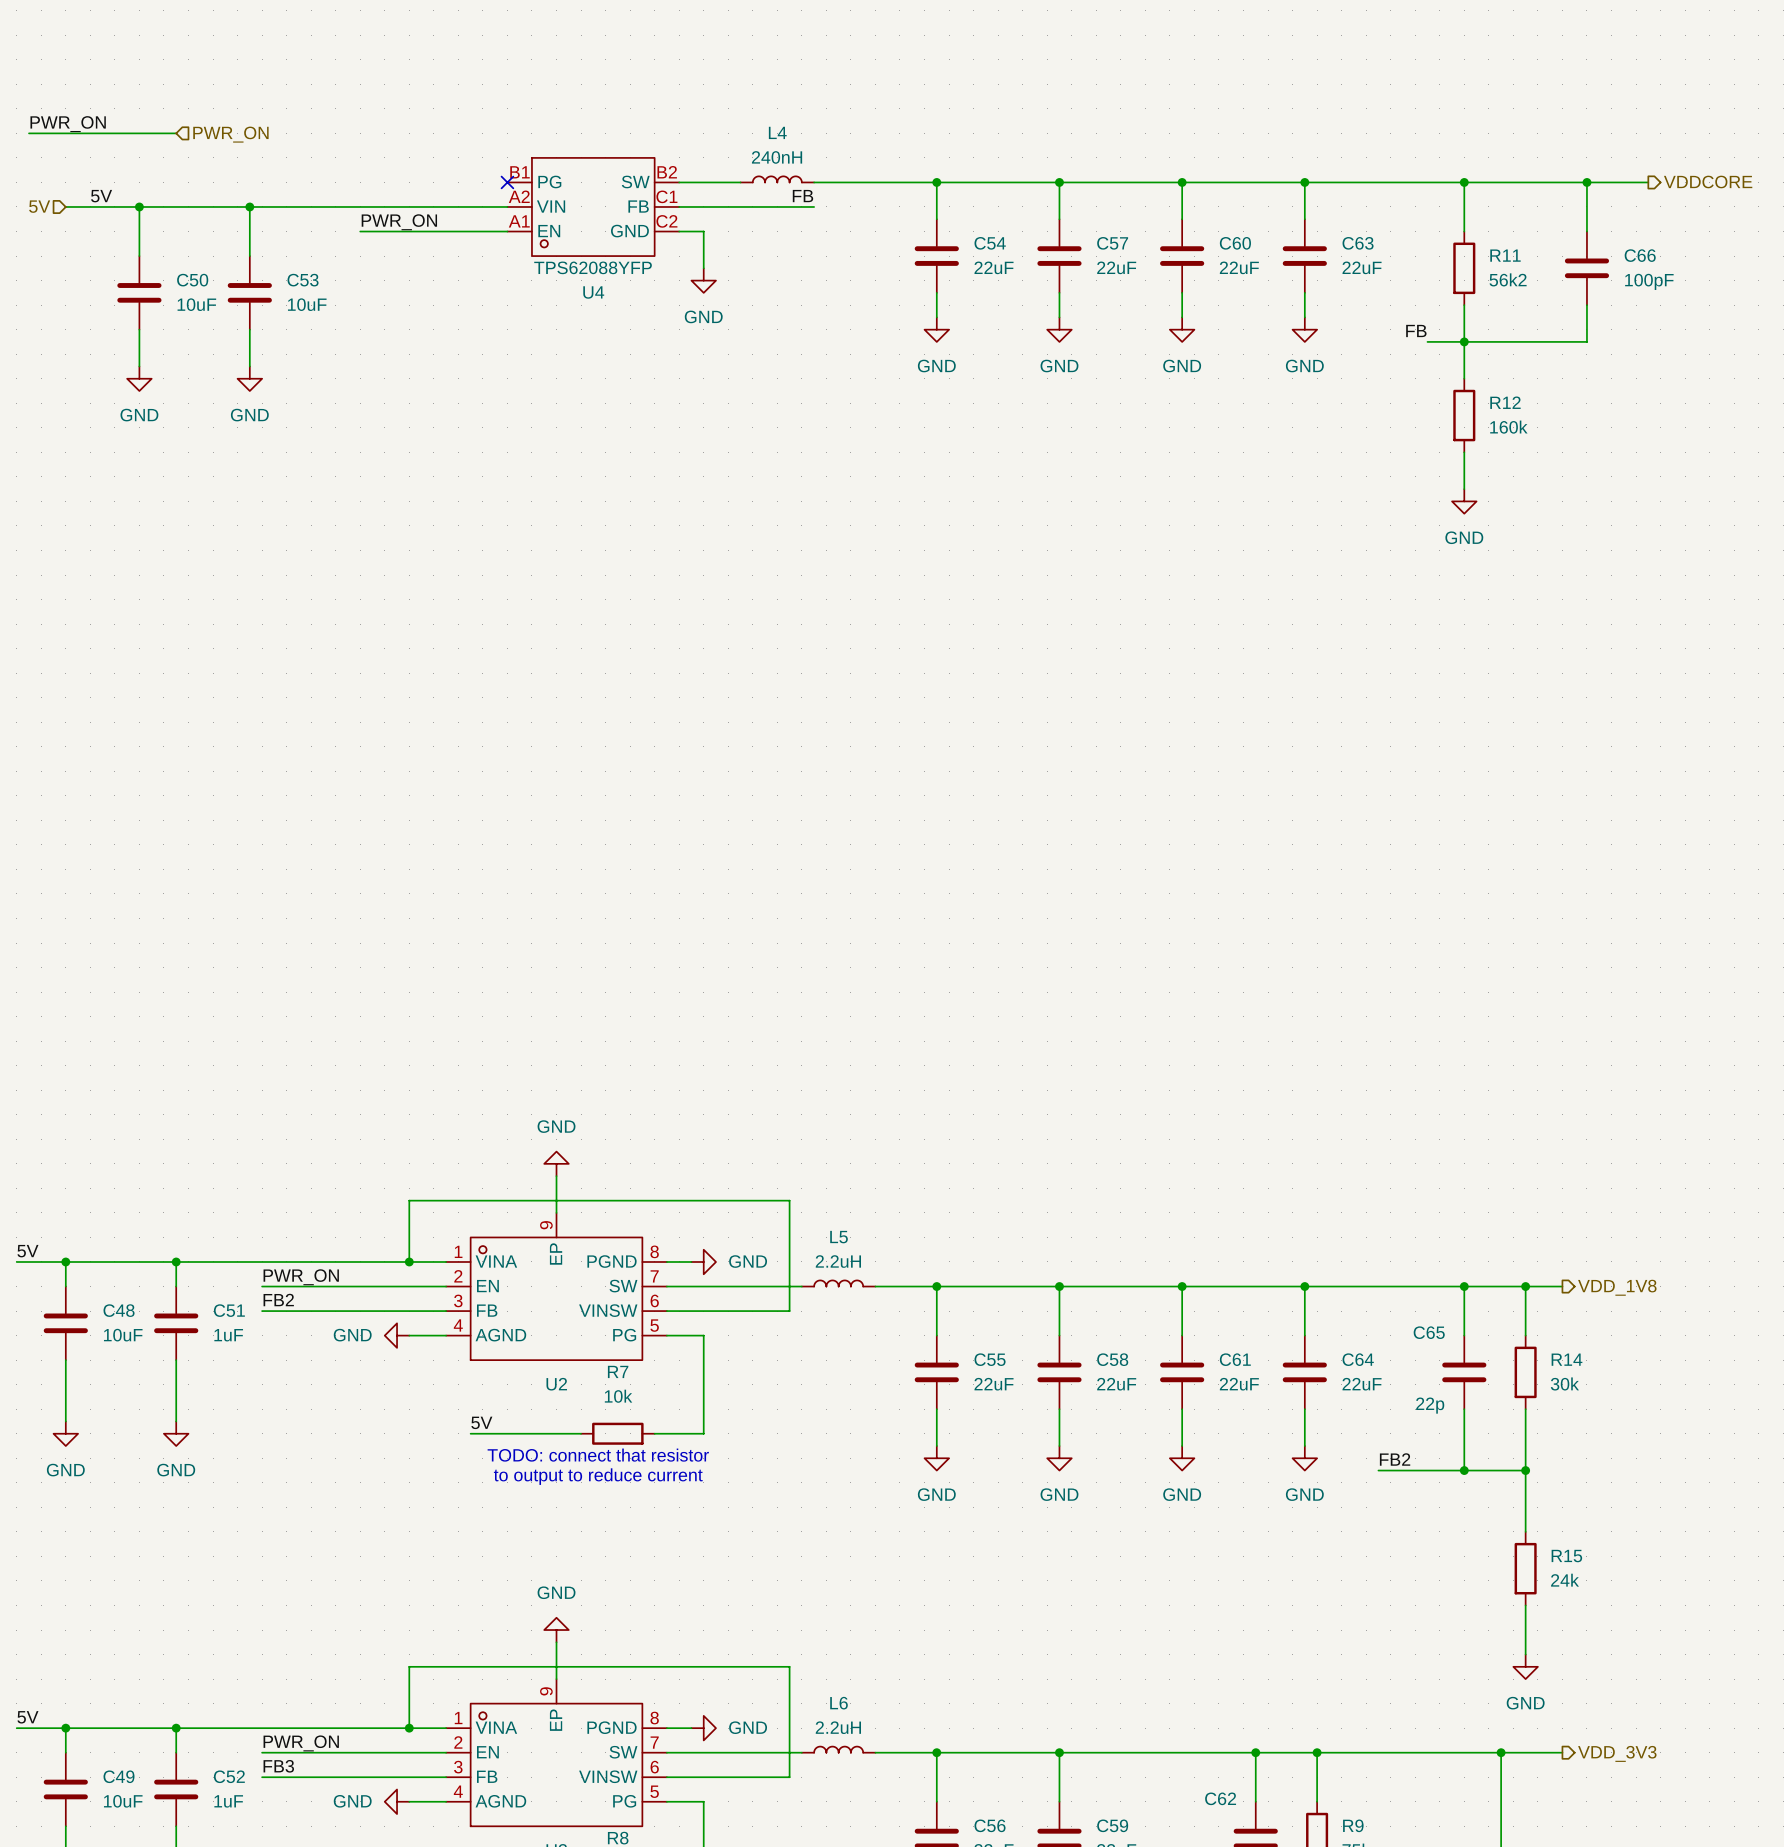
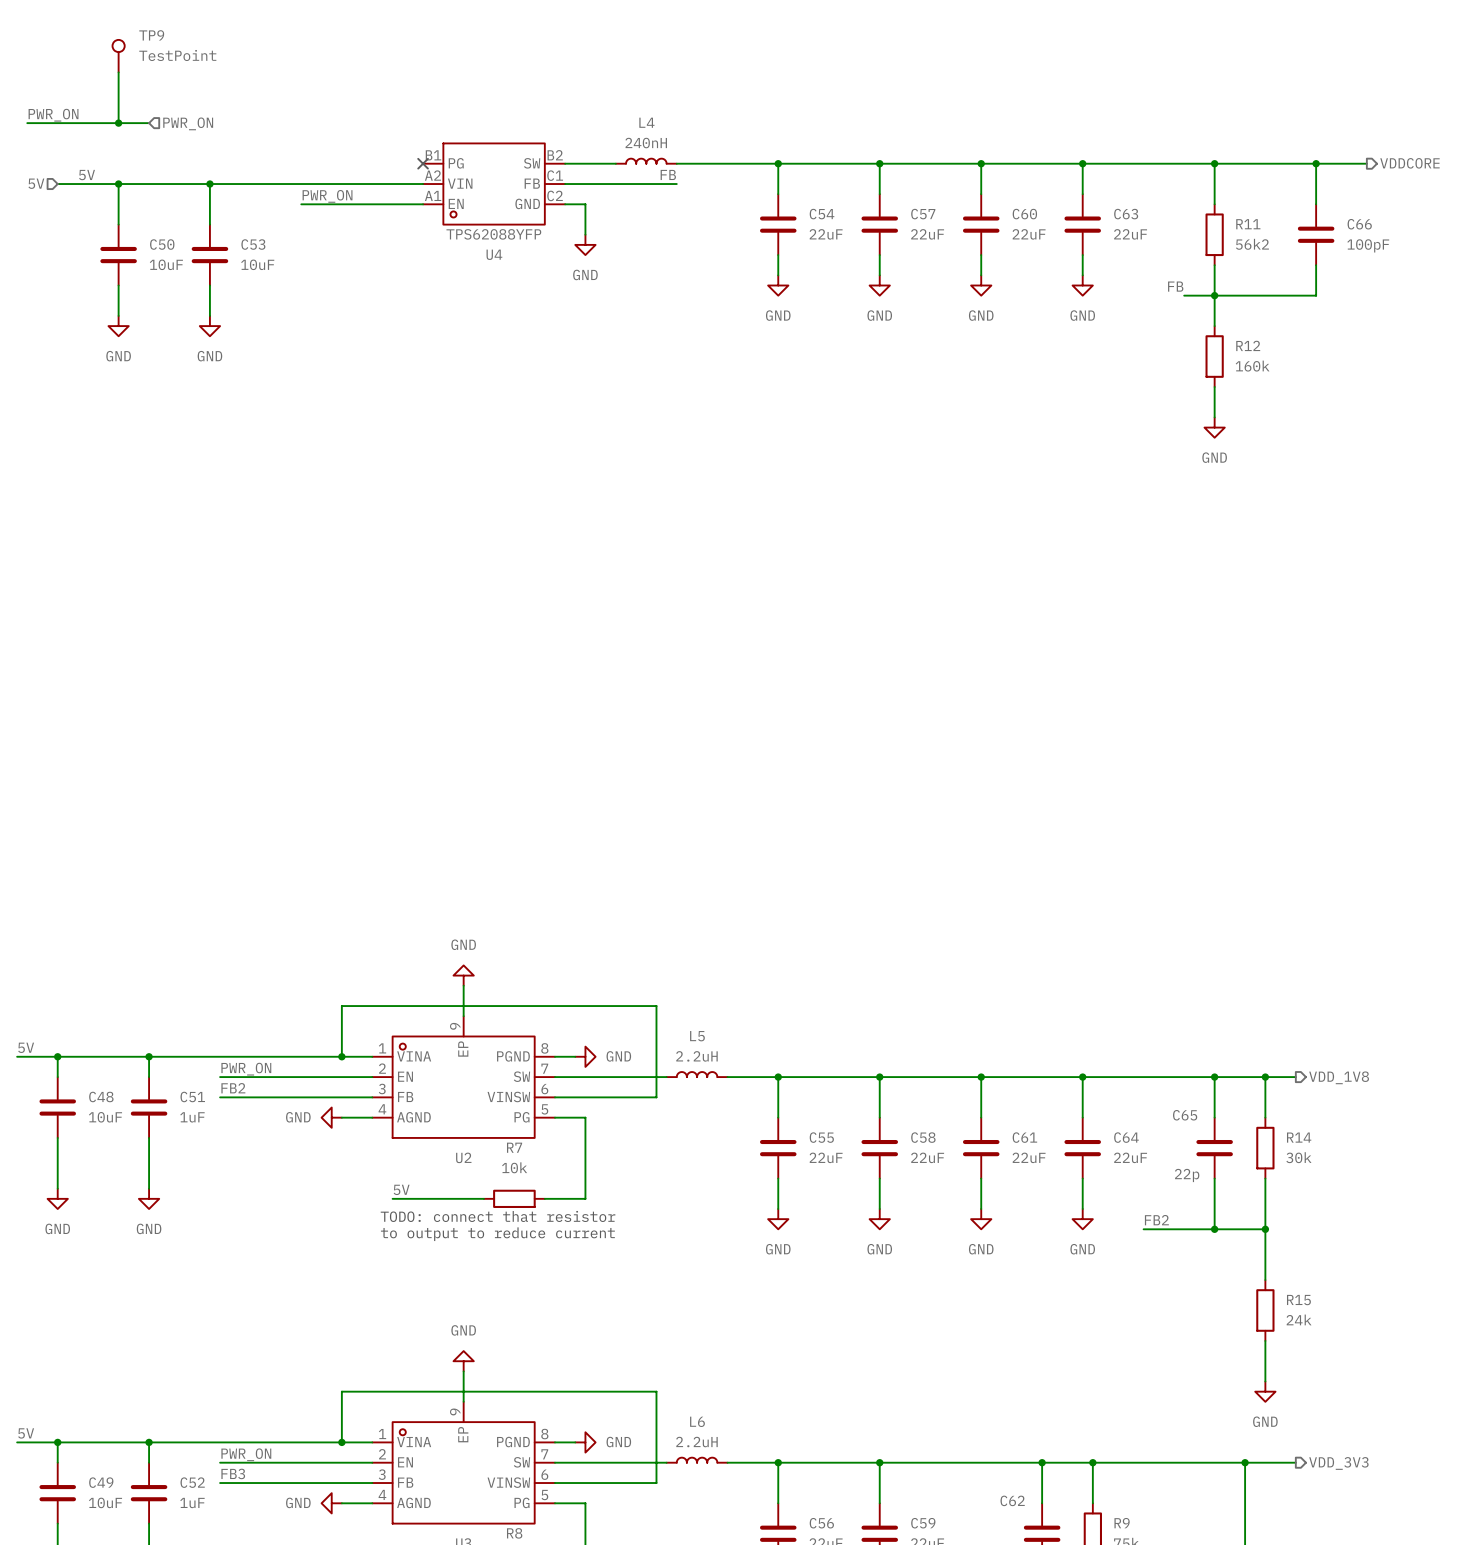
TP9: none -> TestPoint (118, 56)
wire: none -> (118, 72) (118, 123)
junction: none -> (118, 123)

